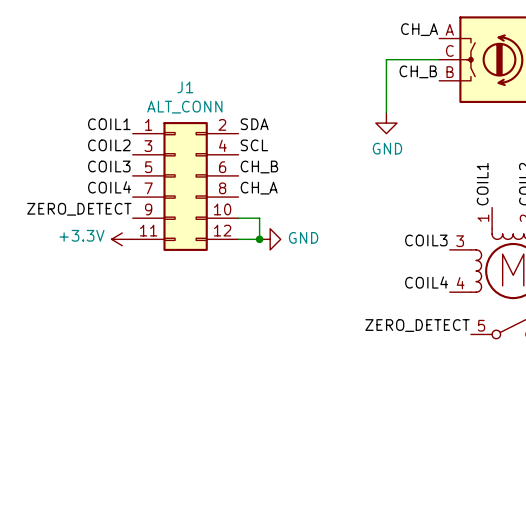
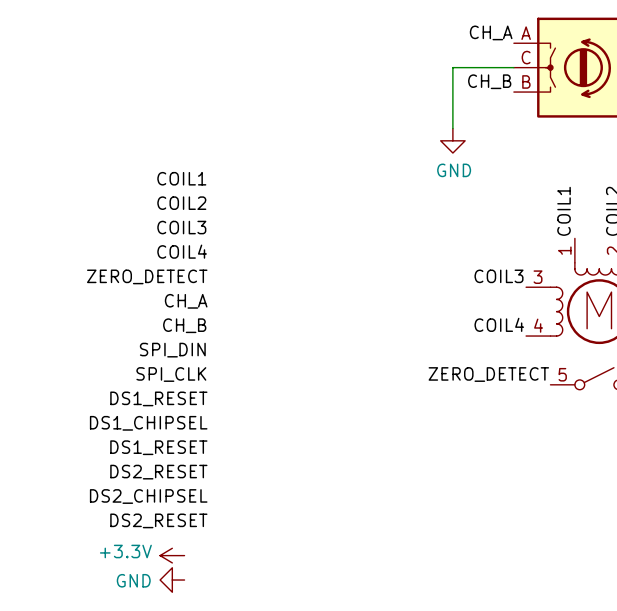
label position: COIL1 (109, 124) -> COIL1 (181, 178)
label: SDA (254, 124) -> none
label position: COIL2 (109, 145) -> COIL2 (181, 203)
label: SCL (254, 145) -> none
label position: COIL3 (109, 166) -> COIL3 (181, 227)
label position: CH_B (259, 167) -> CH_B (184, 325)
J1: ALT_CONN (185, 186) -> none
label position: COIL4 (109, 187) -> COIL4 (182, 251)
label position: CH_A (259, 188) -> CH_A (186, 301)
label position: ZERO_DETECT (79, 209) -> ZERO_DETECT (147, 276)
wire: (238, 218) (259, 218) (259, 239) (238, 239) -> none
power symbol: +3.3V (122, 239) -> none
junction: (259, 239) -> none
power symbol: GND (270, 239) -> none
label: none -> SPI_DIN (172, 350)
label: none -> SPI_CLK (171, 374)
label: none -> DS1_RESET (158, 398)
label: none -> DS1_CHIPSEL (148, 423)
label: none -> DS1_RESET (158, 447)
label: none -> DS2_RESET (158, 472)
label: none -> DS2_CHIPSEL (148, 496)
label: none -> DS2_RESET (158, 520)
power symbol: none -> +3.3V (172, 555)
power symbol: none -> GND (172, 580)

